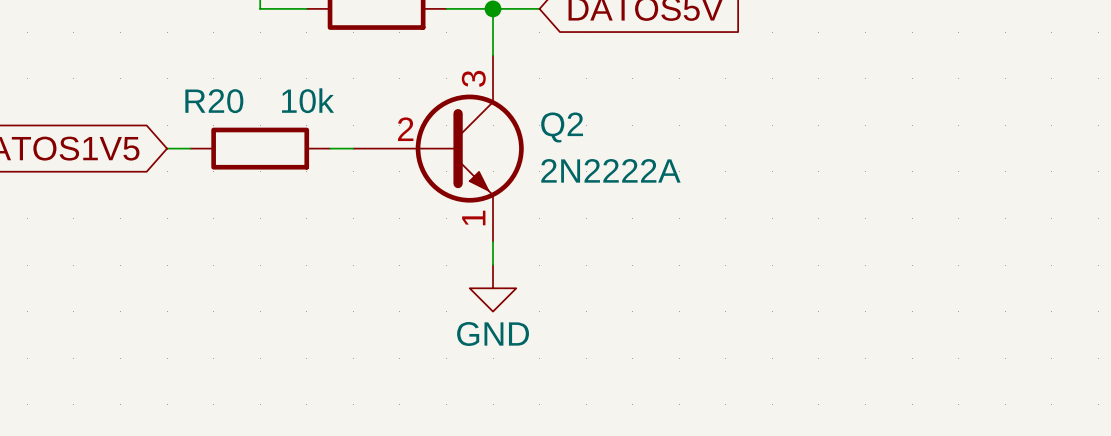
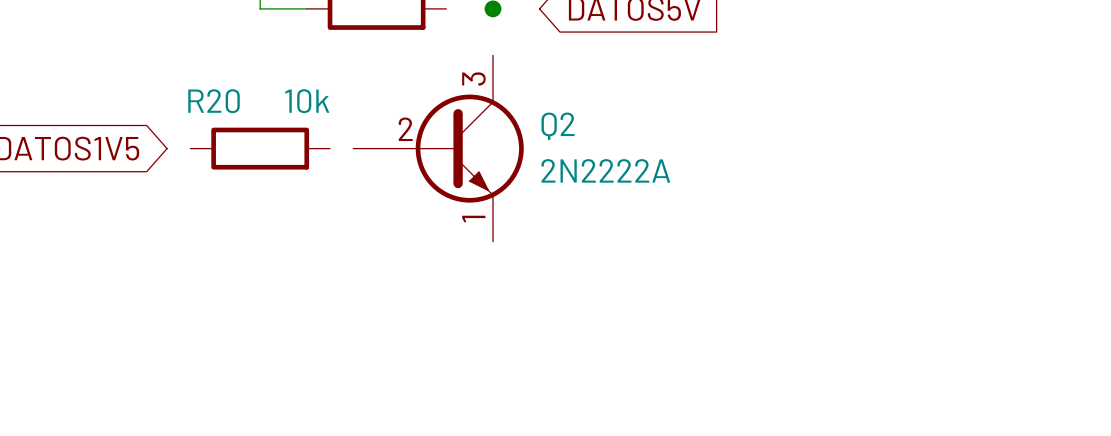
wire: (446, 8) (539, 8) -> none
wire: (493, 8) (493, 55) -> none
wire: (167, 148) (190, 148) -> none
wire: (330, 148) (353, 148) -> none
wire: (493, 241) (493, 265) -> none
power symbol: GND (493, 288) -> none

